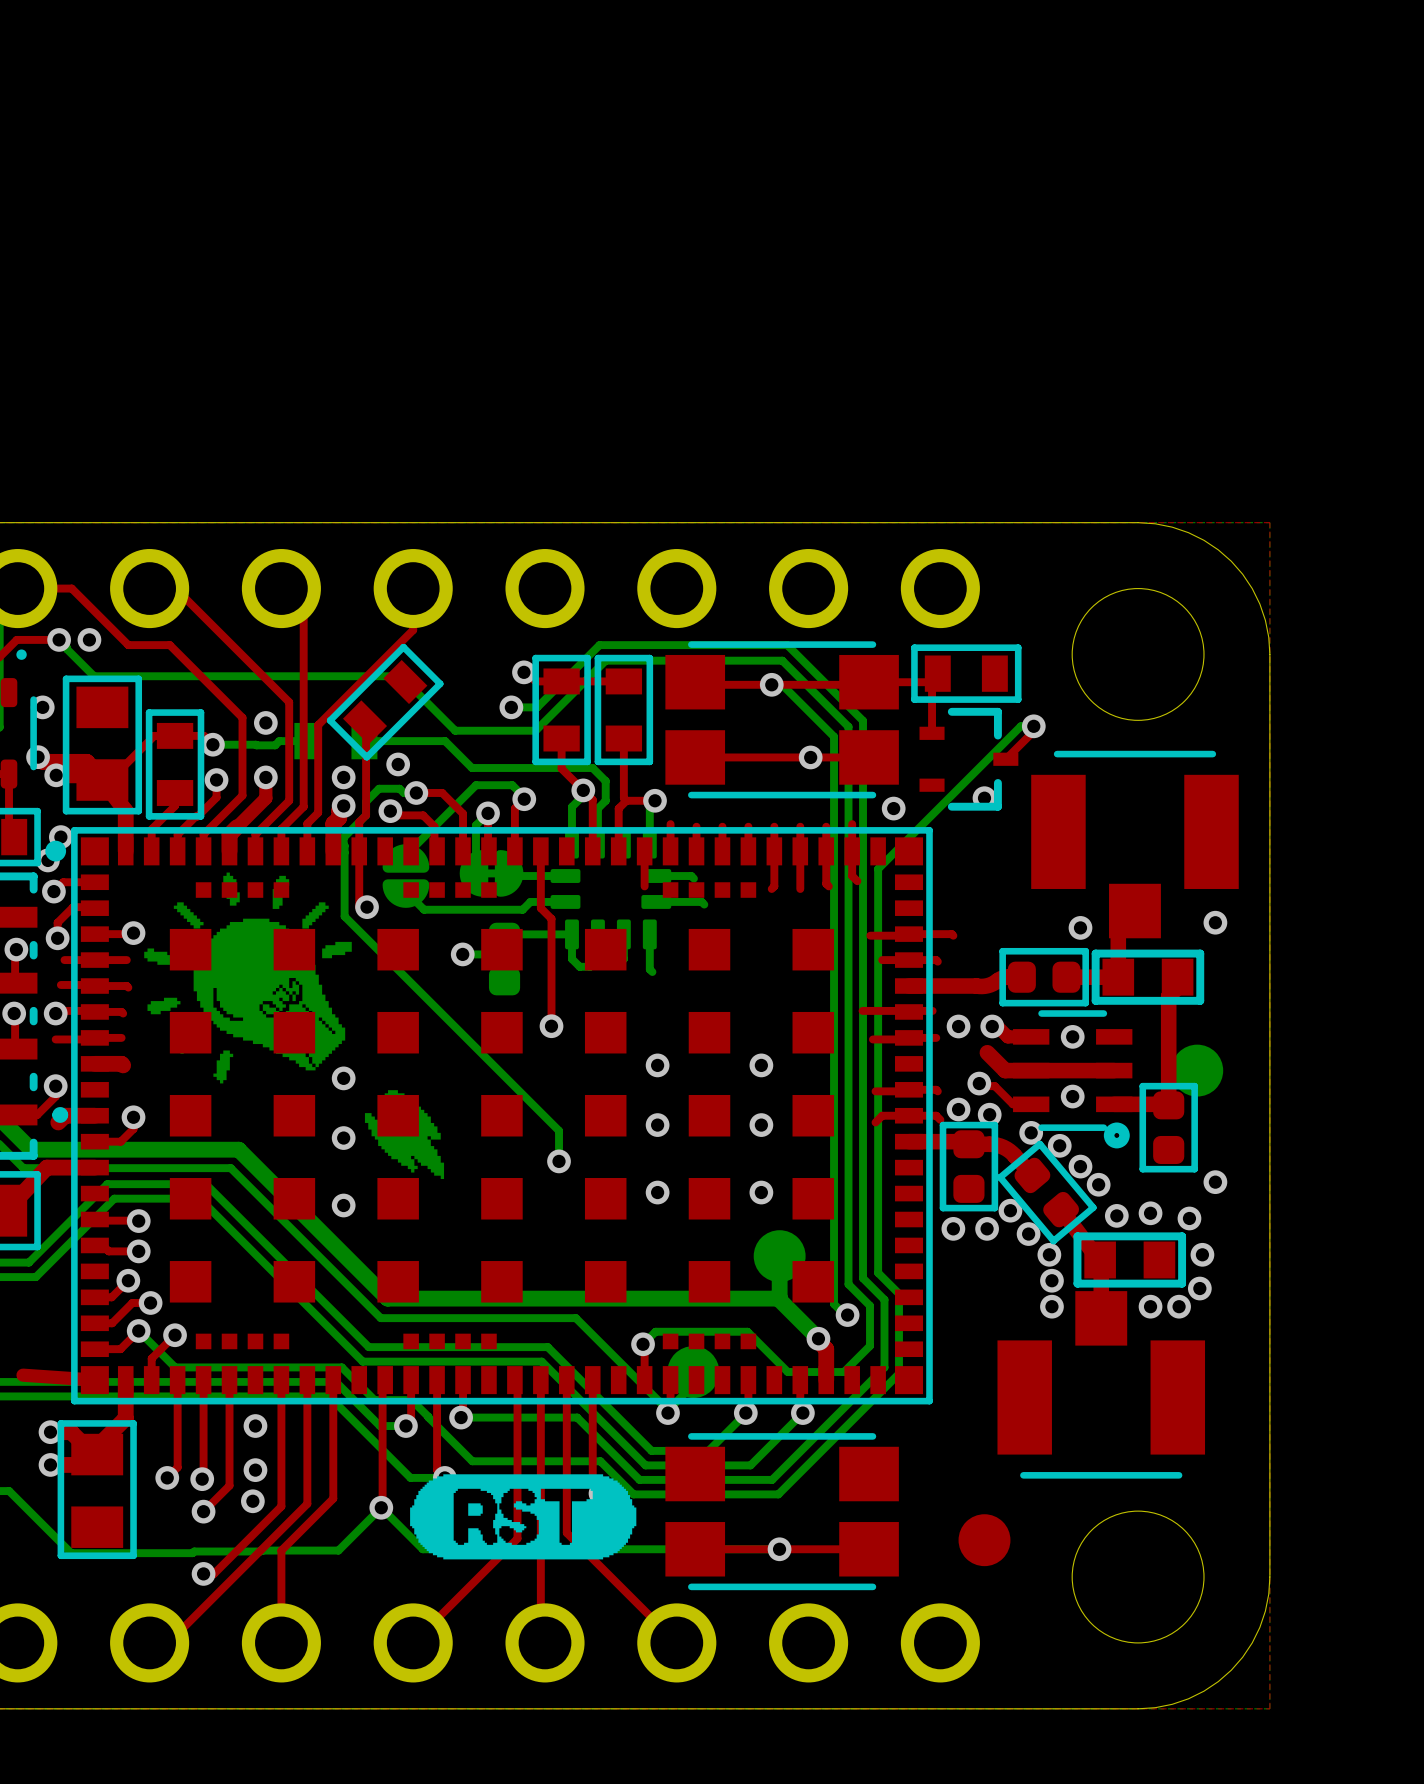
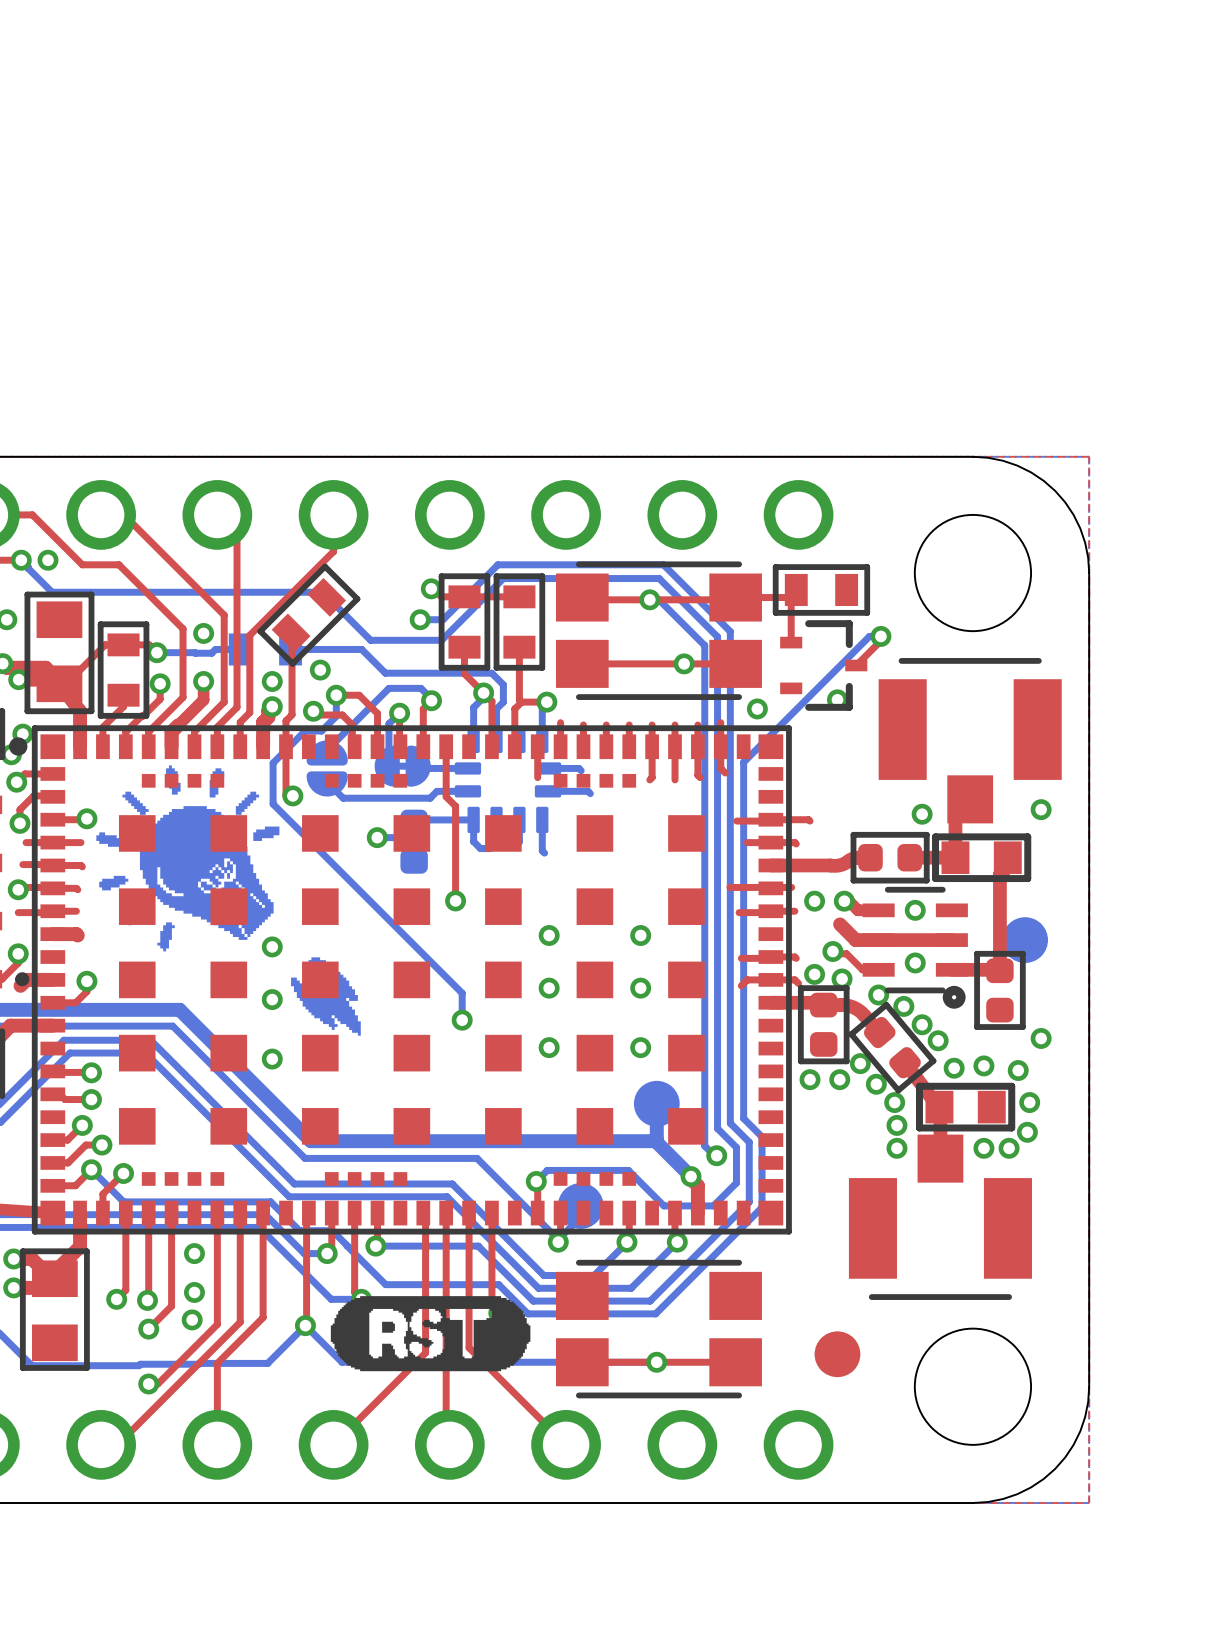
bottom track: (416, 792) (403, 792) (399, 788) (379, 788) (366, 801) (366, 815) (343, 837) (344, 869) -> (336, 695) (336, 716) (321, 731) (305, 731) (273, 763)

